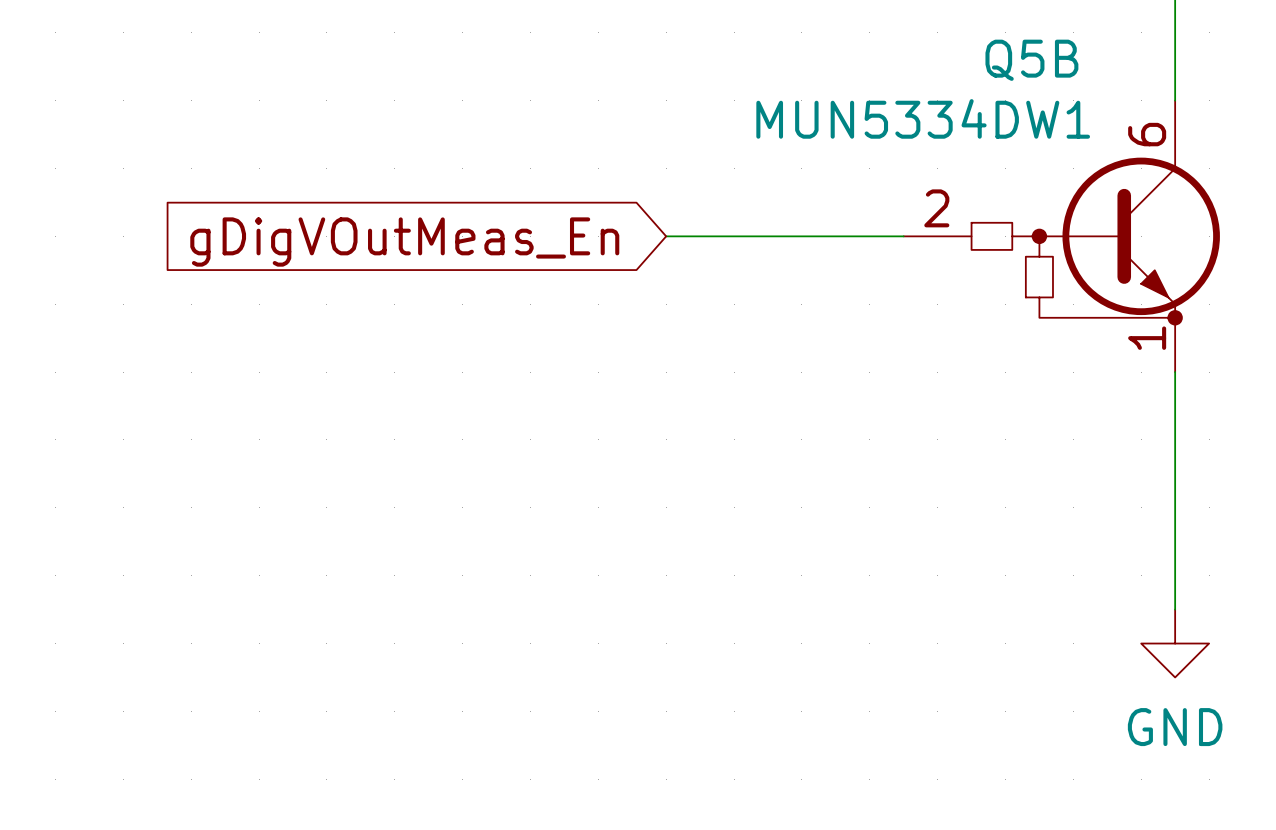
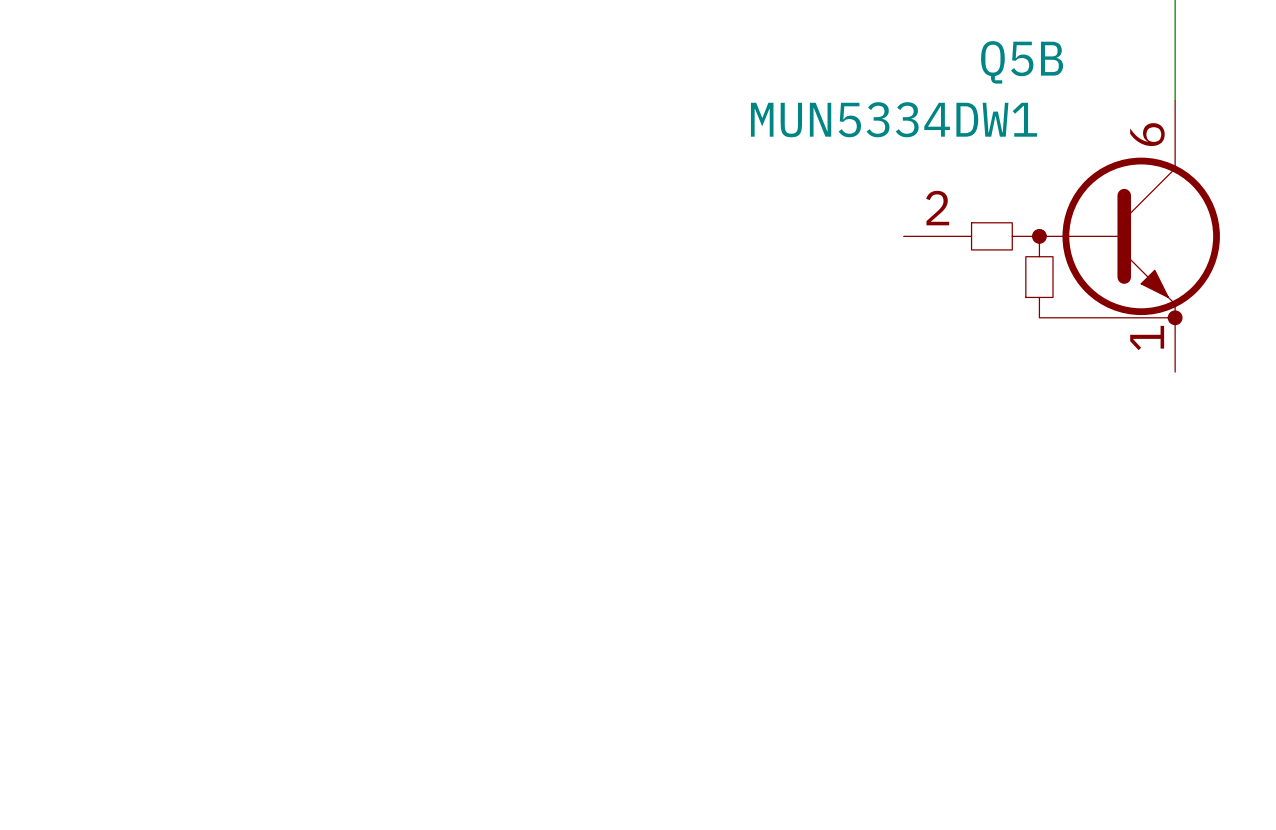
wire: (666, 236) (903, 236) -> none
global label: gDigVOutMeas_En (404, 242) -> none
wire: (1175, 372) (1175, 609) -> none
power symbol: GND (1175, 643) -> none

